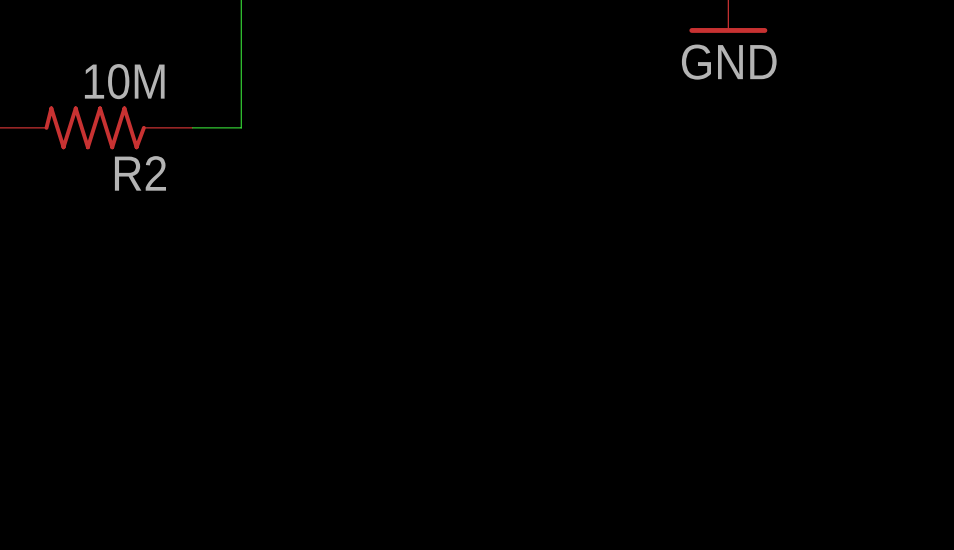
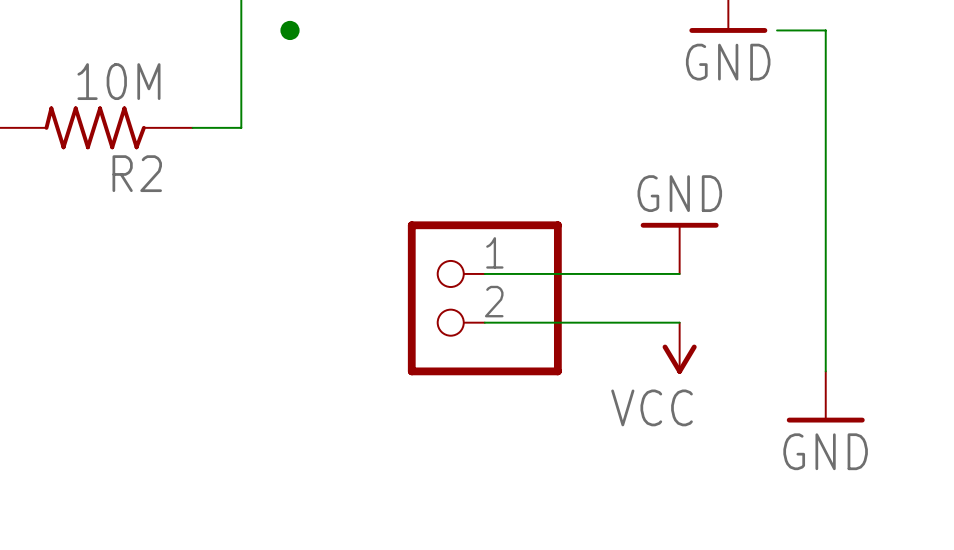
junction: none -> (290, 30)
wire: none -> (777, 30) (825, 30) (825, 371)
power symbol: none -> GND (679, 248)
wire: none -> (484, 273) (679, 273)
part: none -> (484, 298)
wire: none -> (484, 322) (679, 322)
power symbol: none -> VCC (679, 348)
power symbol: none -> GND (825, 396)

